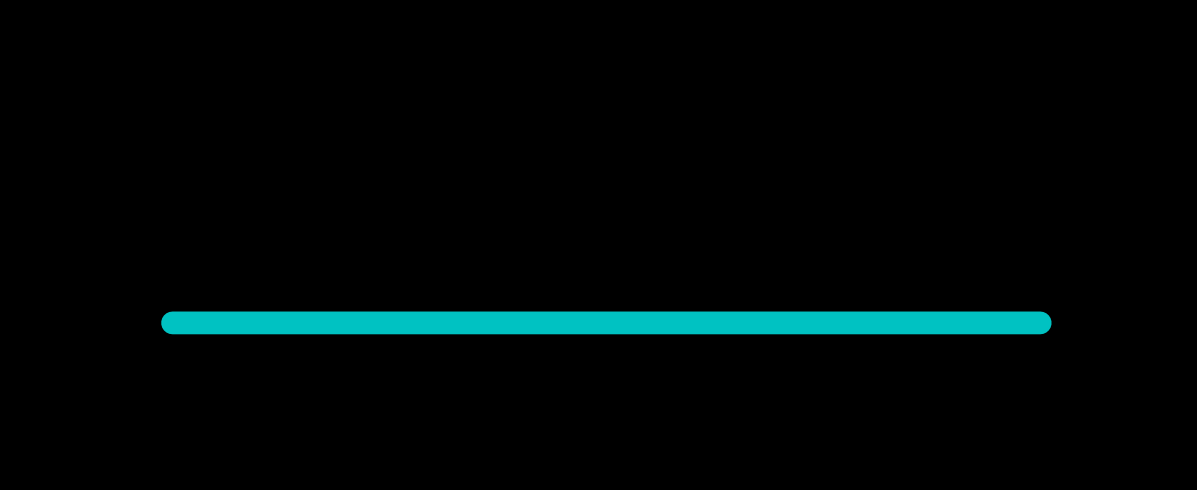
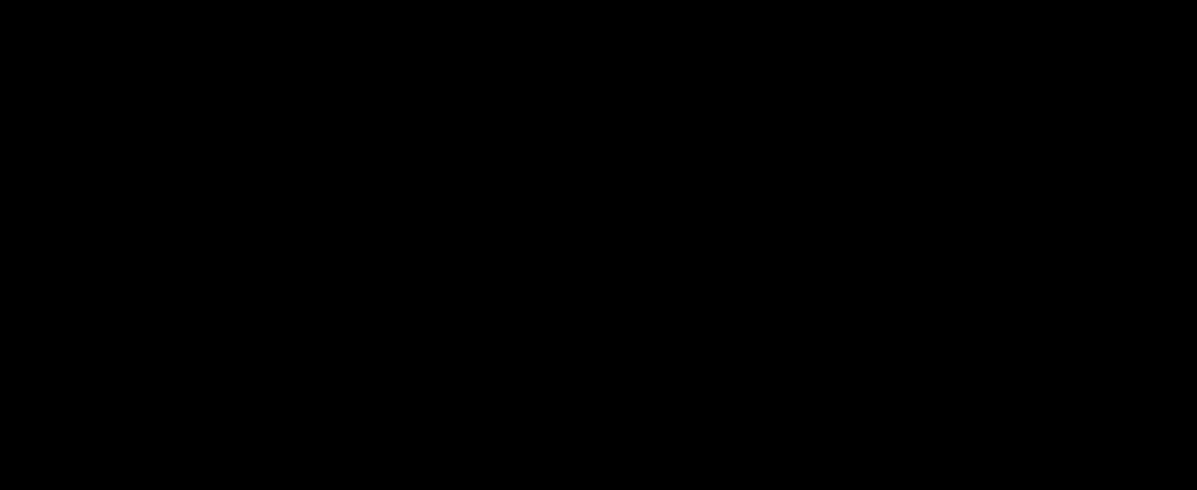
line: (172, 322) (1040, 322) -> none

